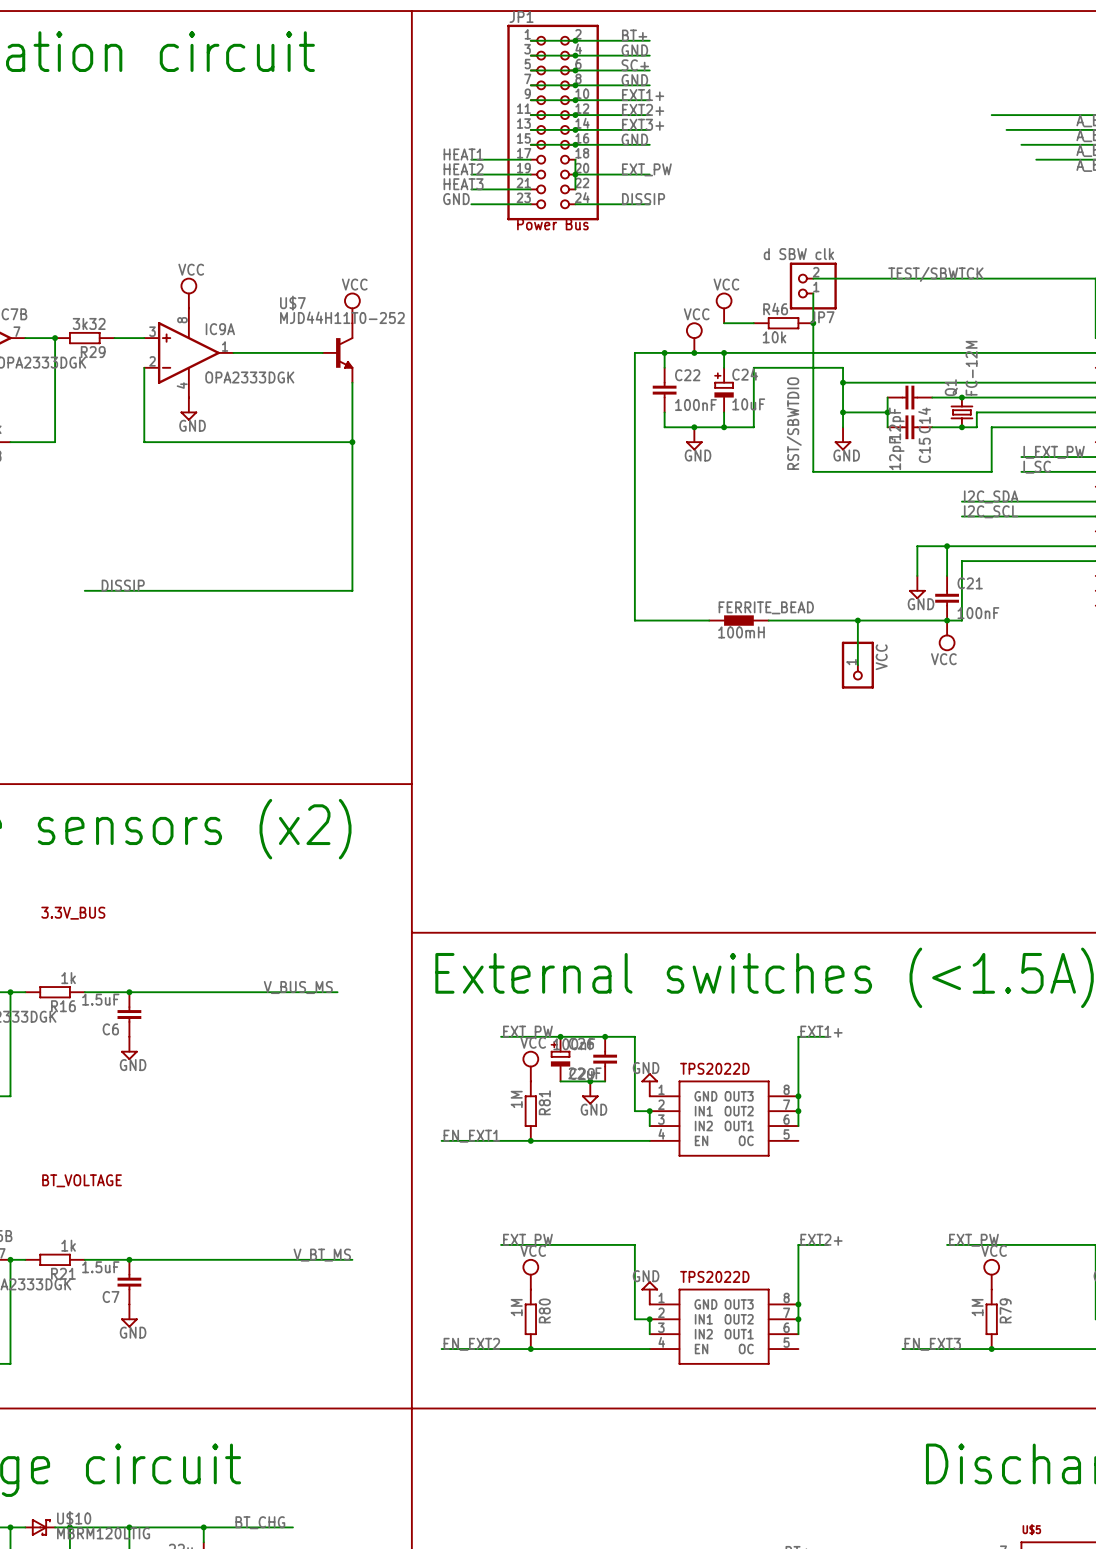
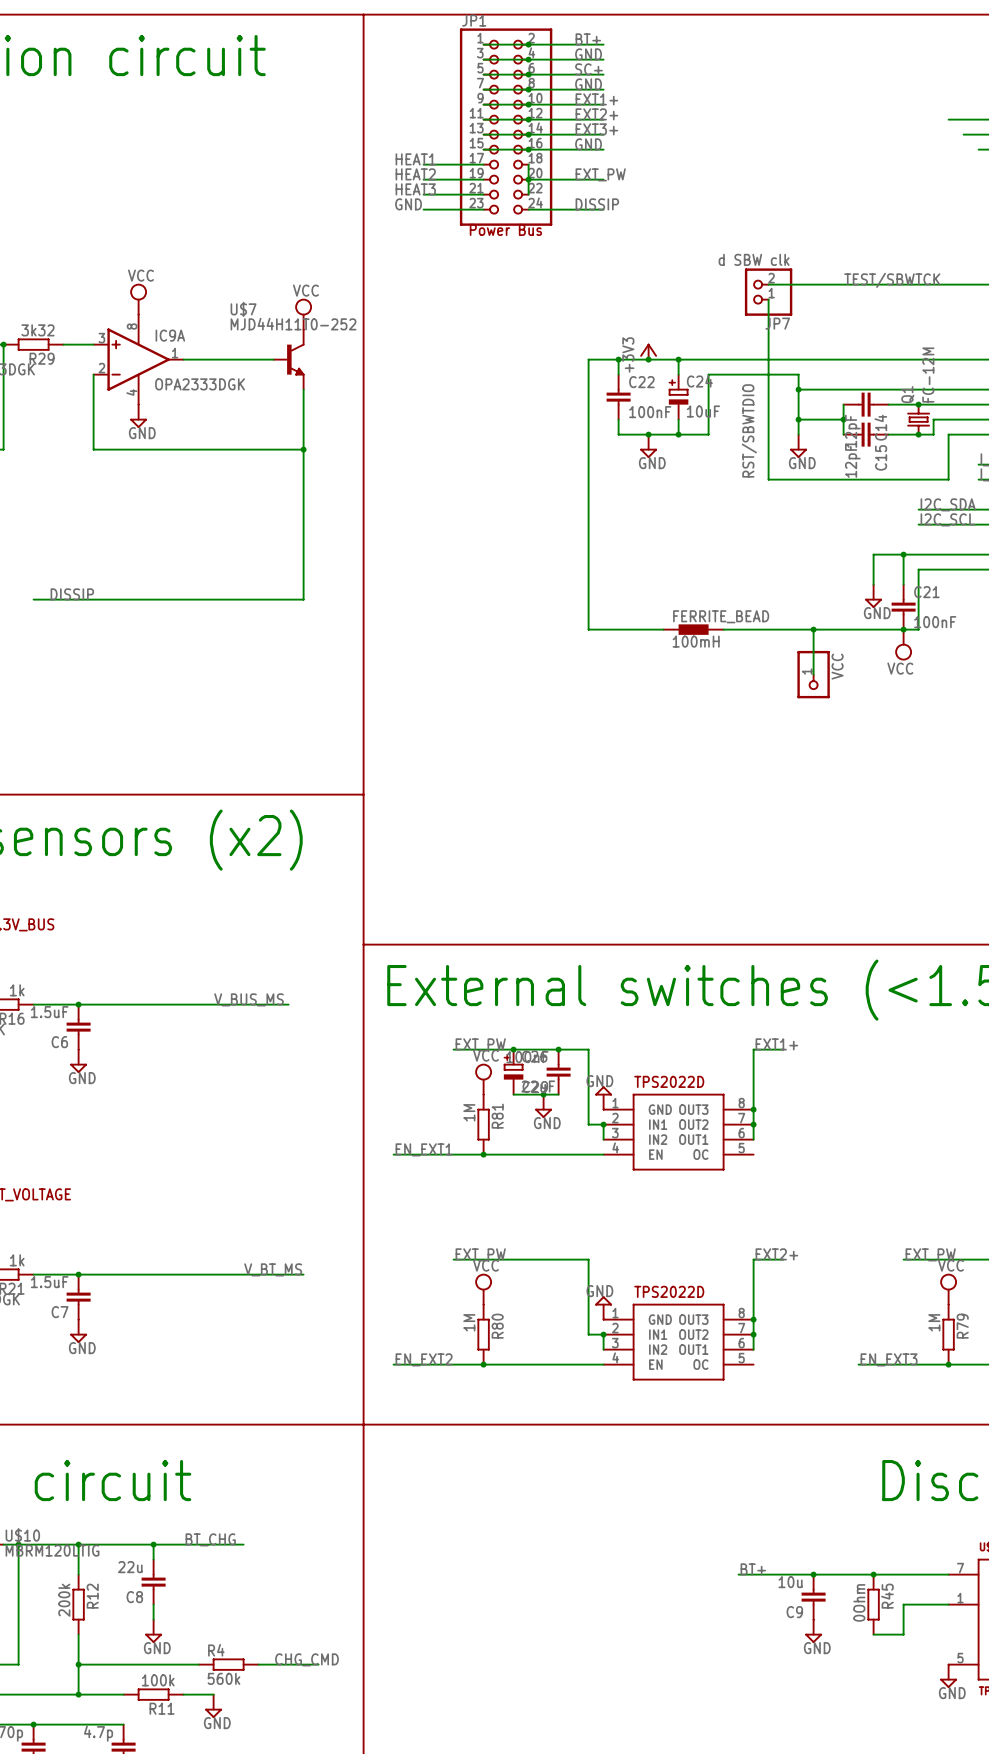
power symbol: VCC (724, 307) -> none
wire: (724, 323) (753, 323) -> none
R46: 10k (783, 323) -> none
junction: (813, 323) -> none
power symbol: VCC (694, 337) -> none
power symbol: none -> +3V3 (648, 351)

